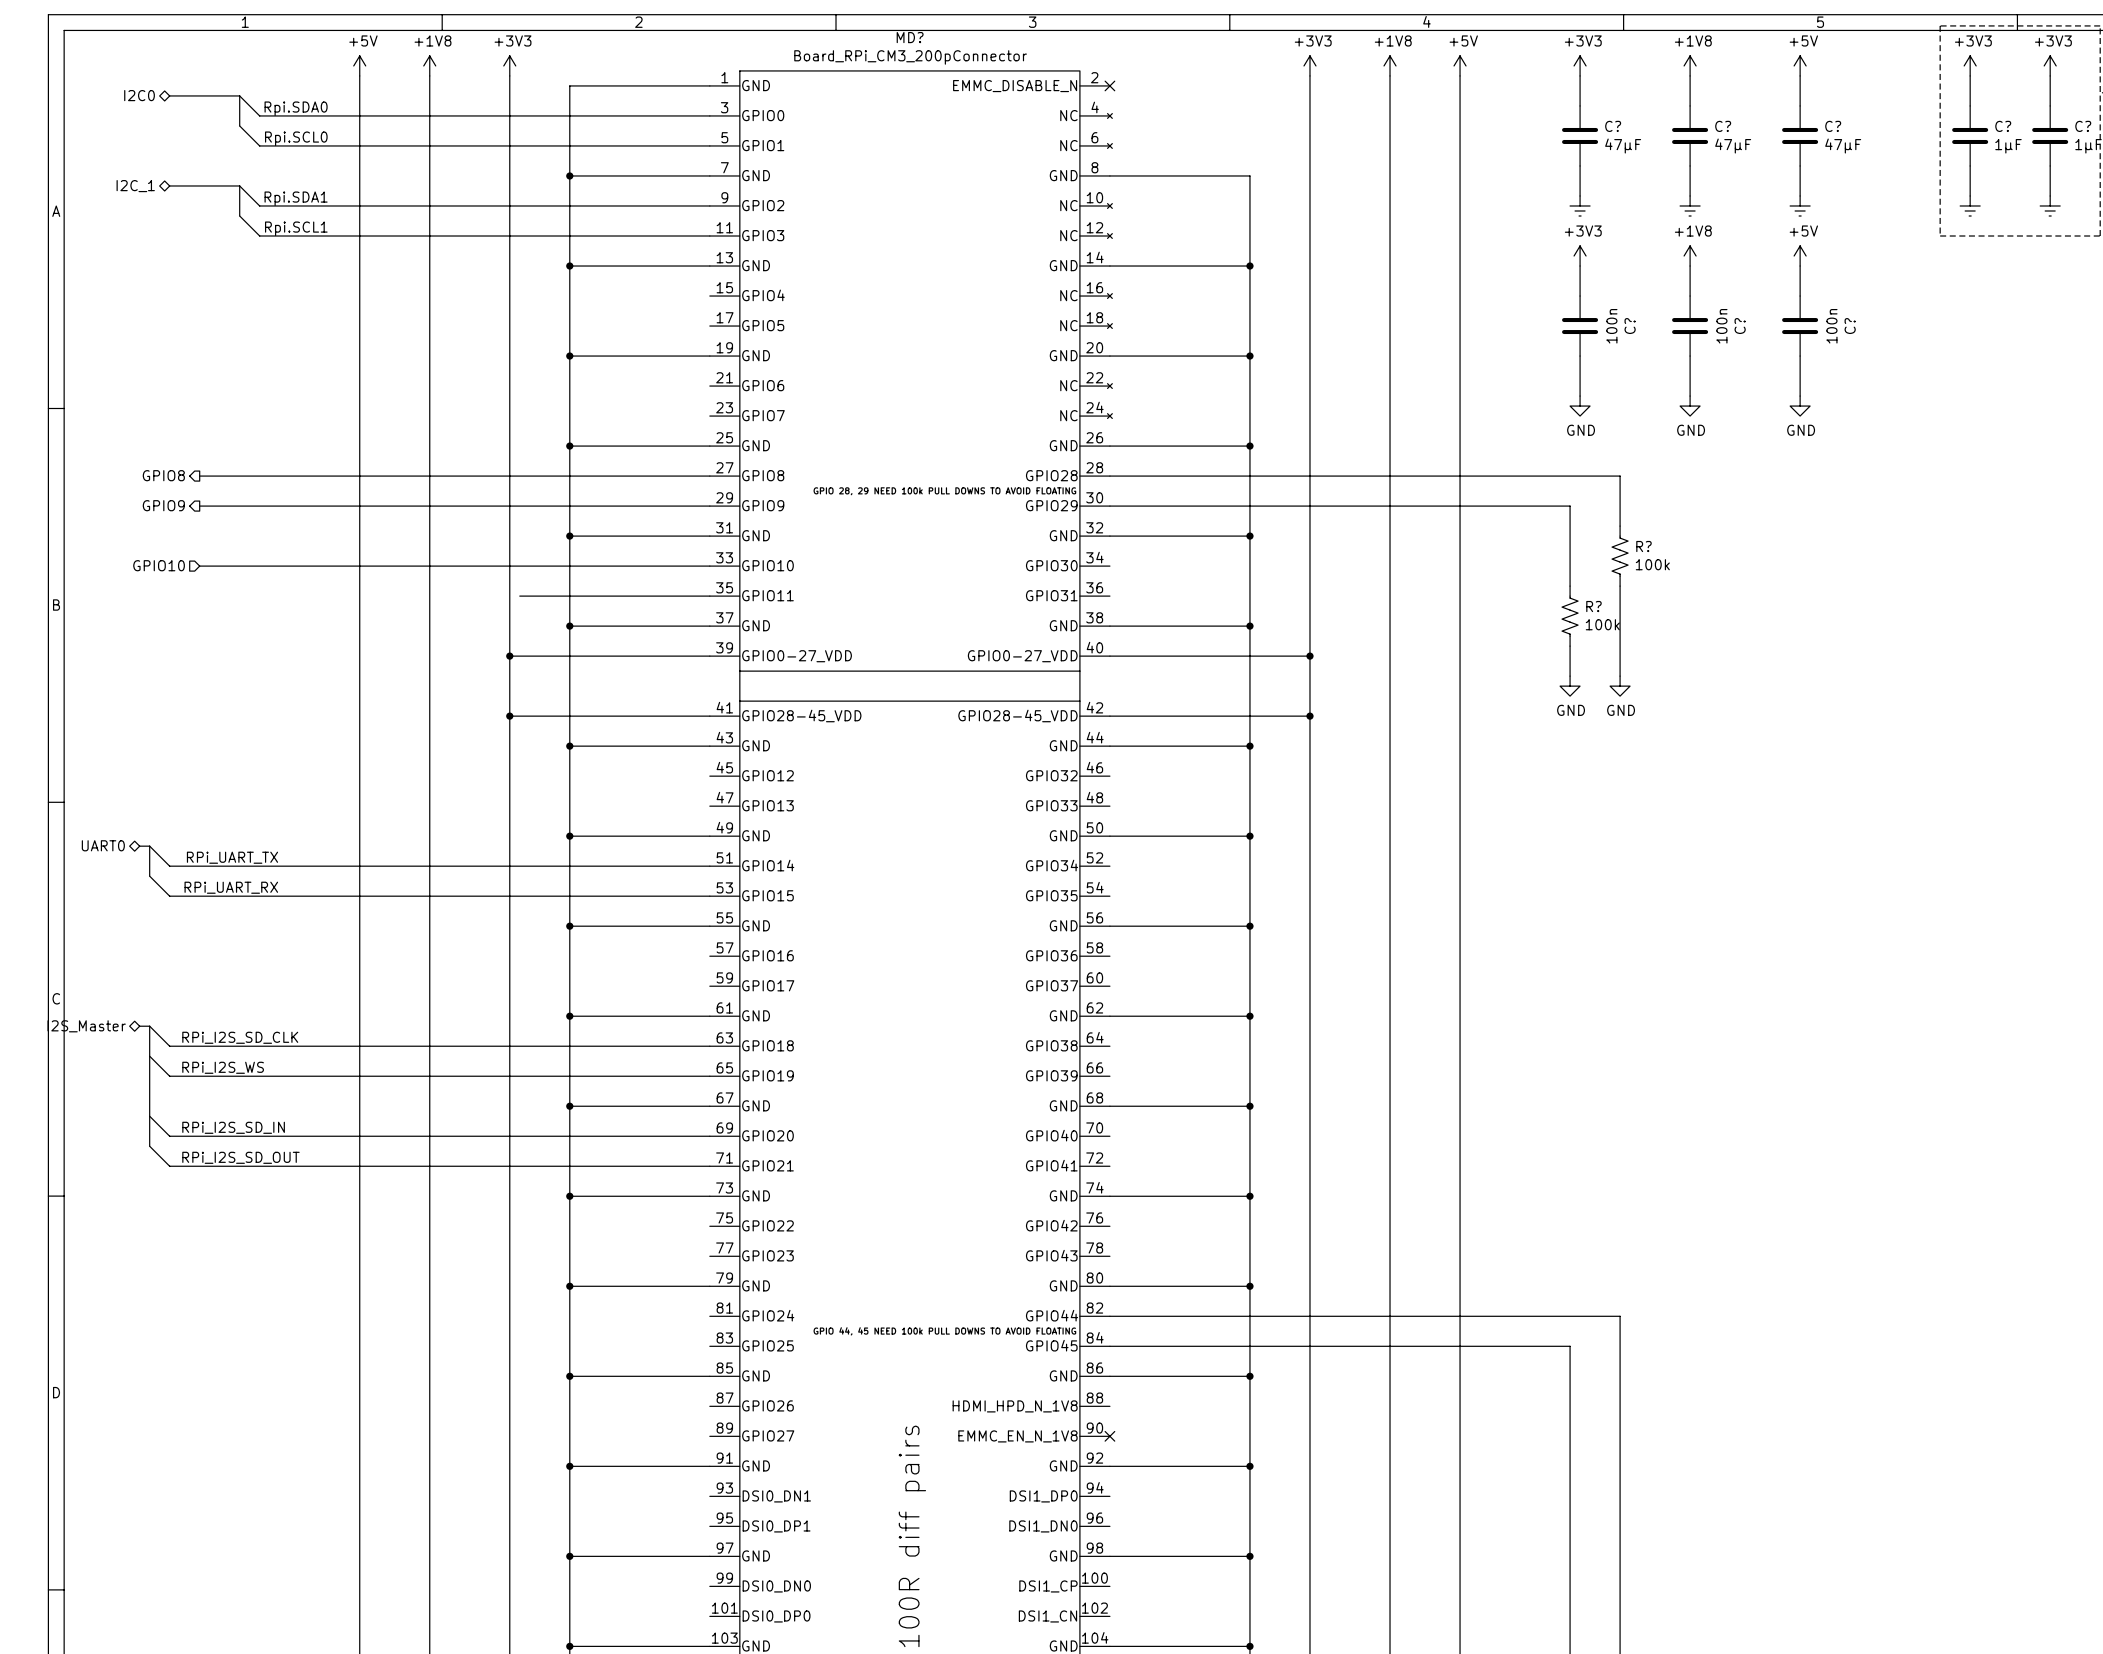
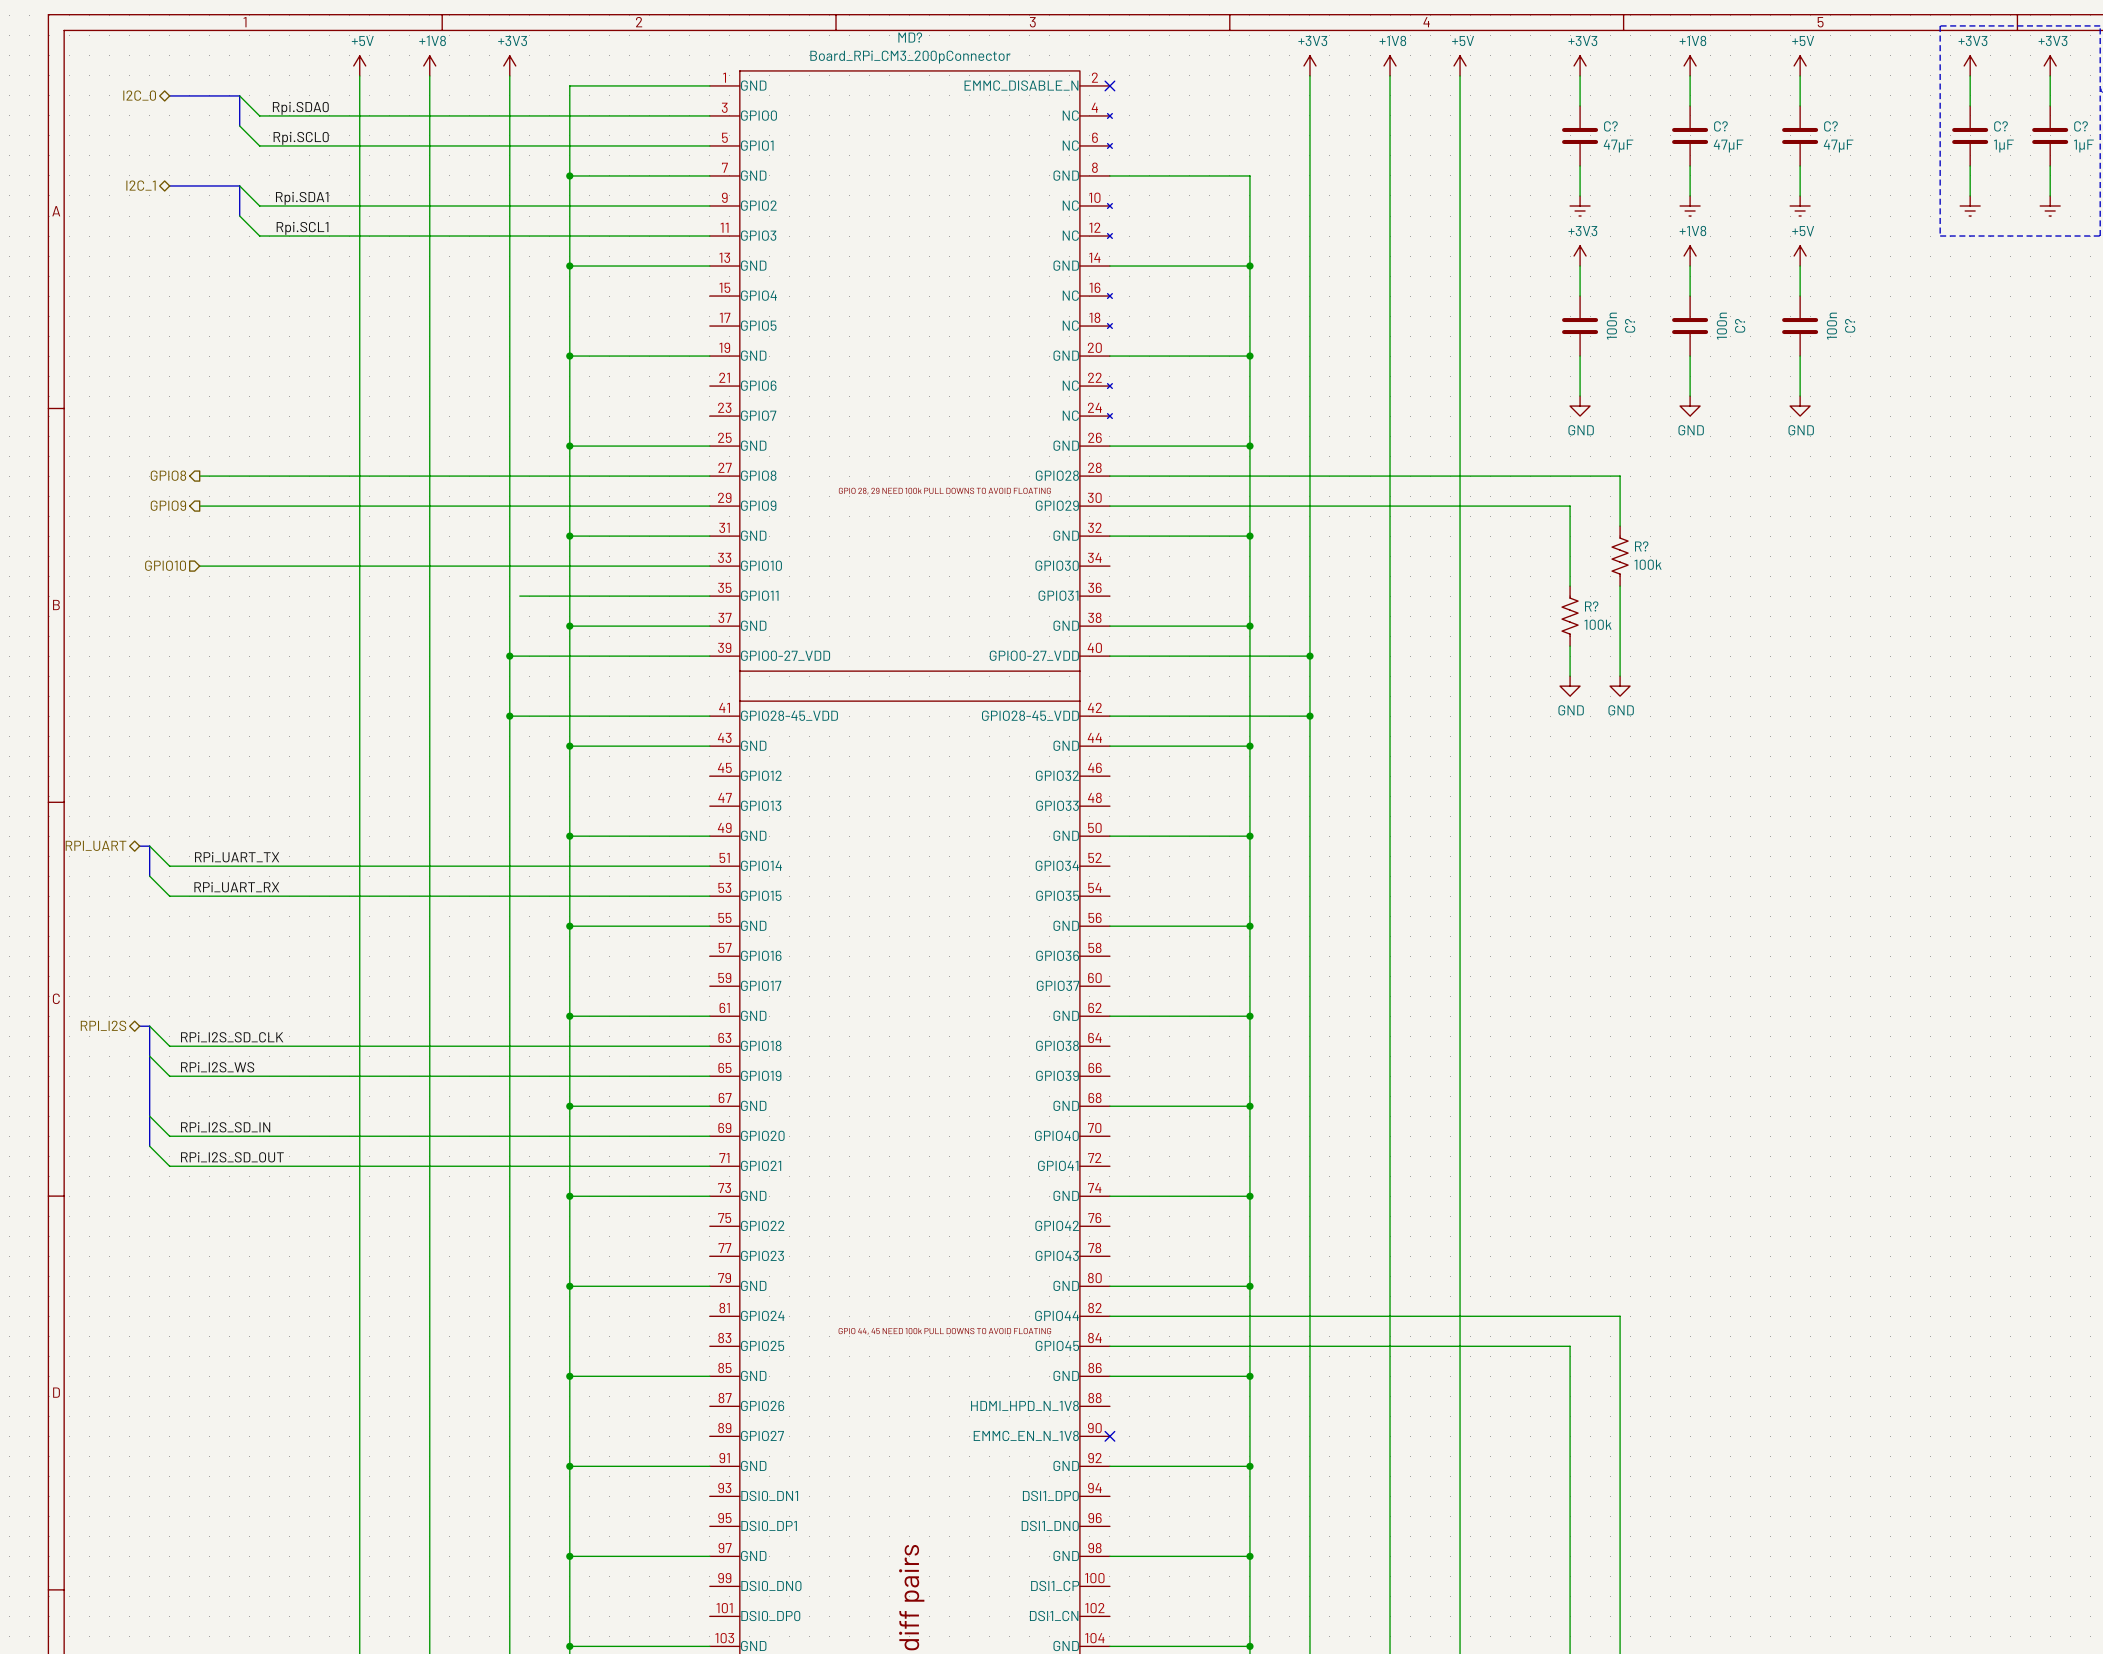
hierarchical label: I2C0 (139, 95) -> I2C_0 (139, 95)
hierarchical label: UART0 (103, 845) -> RPI_UART (96, 845)
hierarchical label: I2S_Master (86, 1026) -> RPI_I2S (103, 1025)

